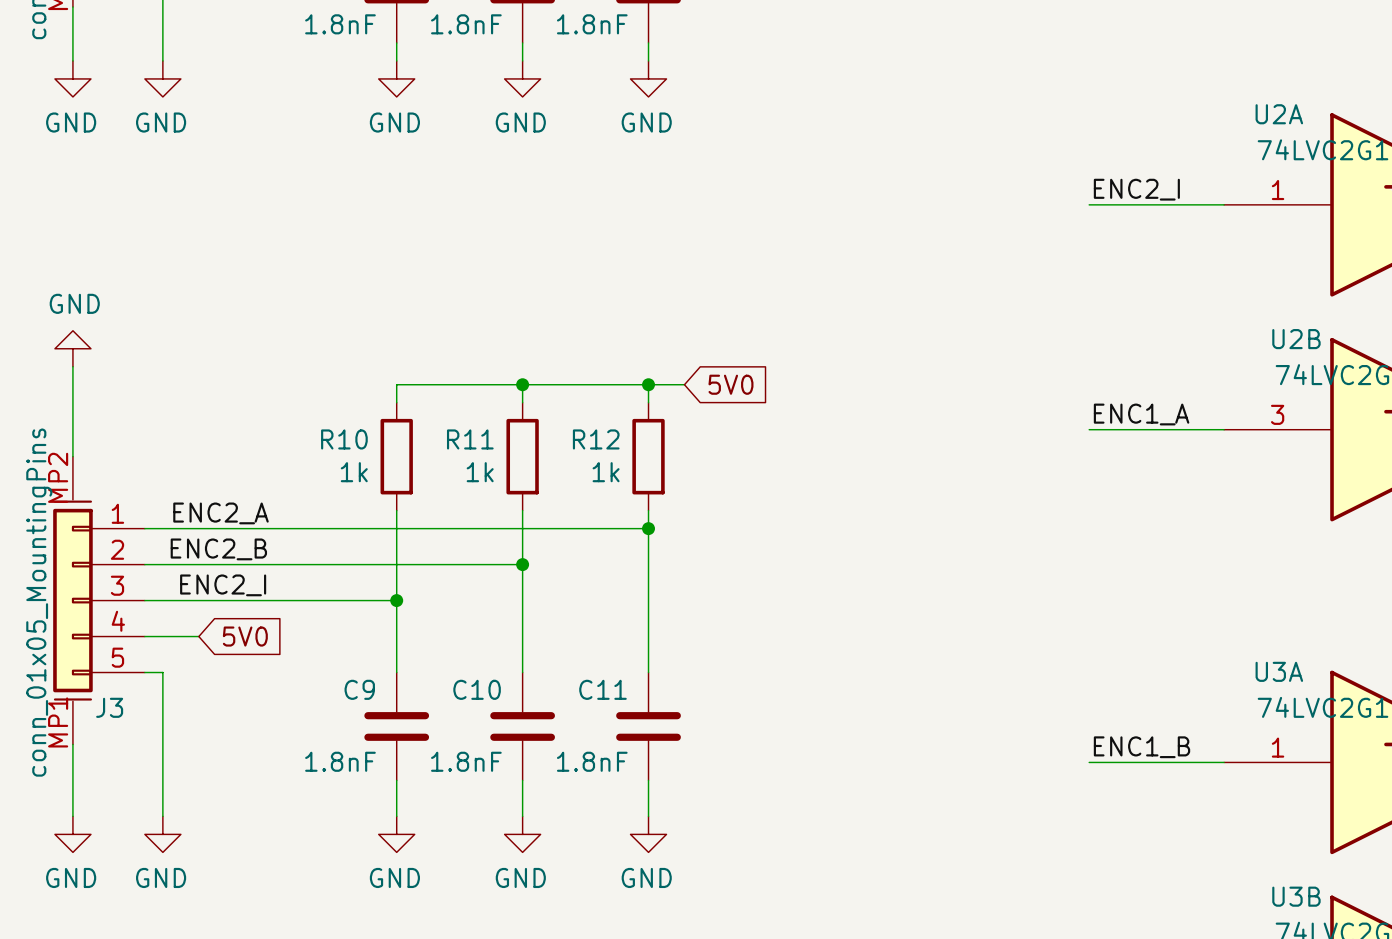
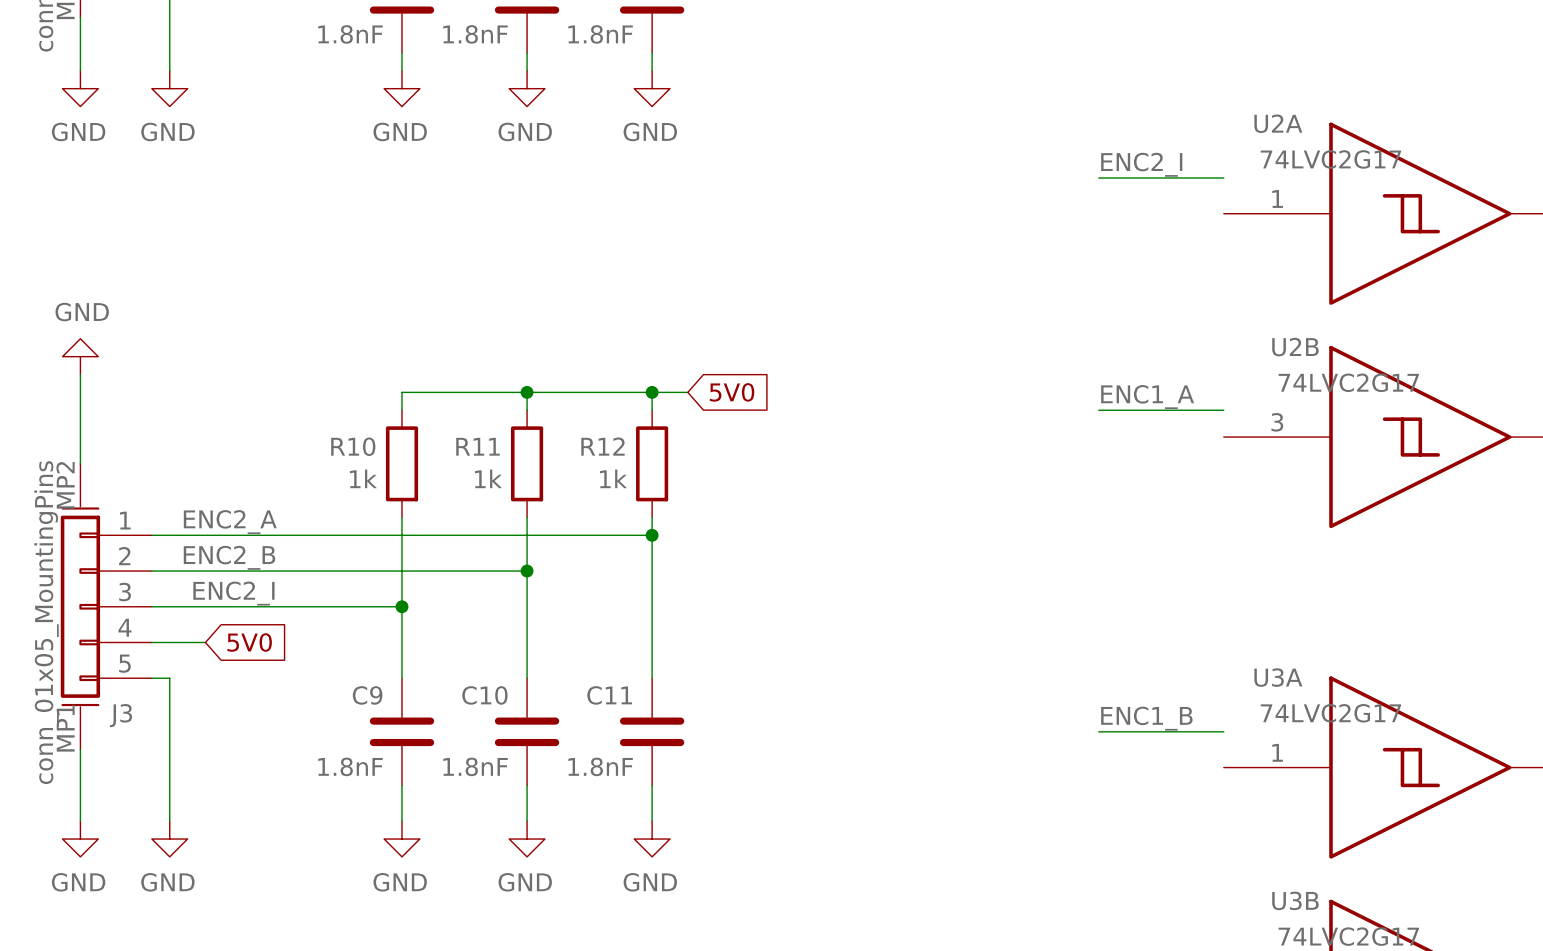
wire: none -> (1098, 178) (1223, 178)
label position: ENC2_I (1136, 189) -> ENC2_I (1141, 164)
wire: (1089, 204) (1224, 204) -> none
wire: none -> (1098, 410) (1223, 410)
label position: ENC1_A (1141, 414) -> ENC1_A (1147, 397)
wire: (1089, 429) (1224, 429) -> none
wire: none -> (1098, 731) (1223, 731)
label position: ENC1_B (1141, 747) -> ENC1_B (1146, 718)
wire: (1089, 762) (1224, 762) -> none

